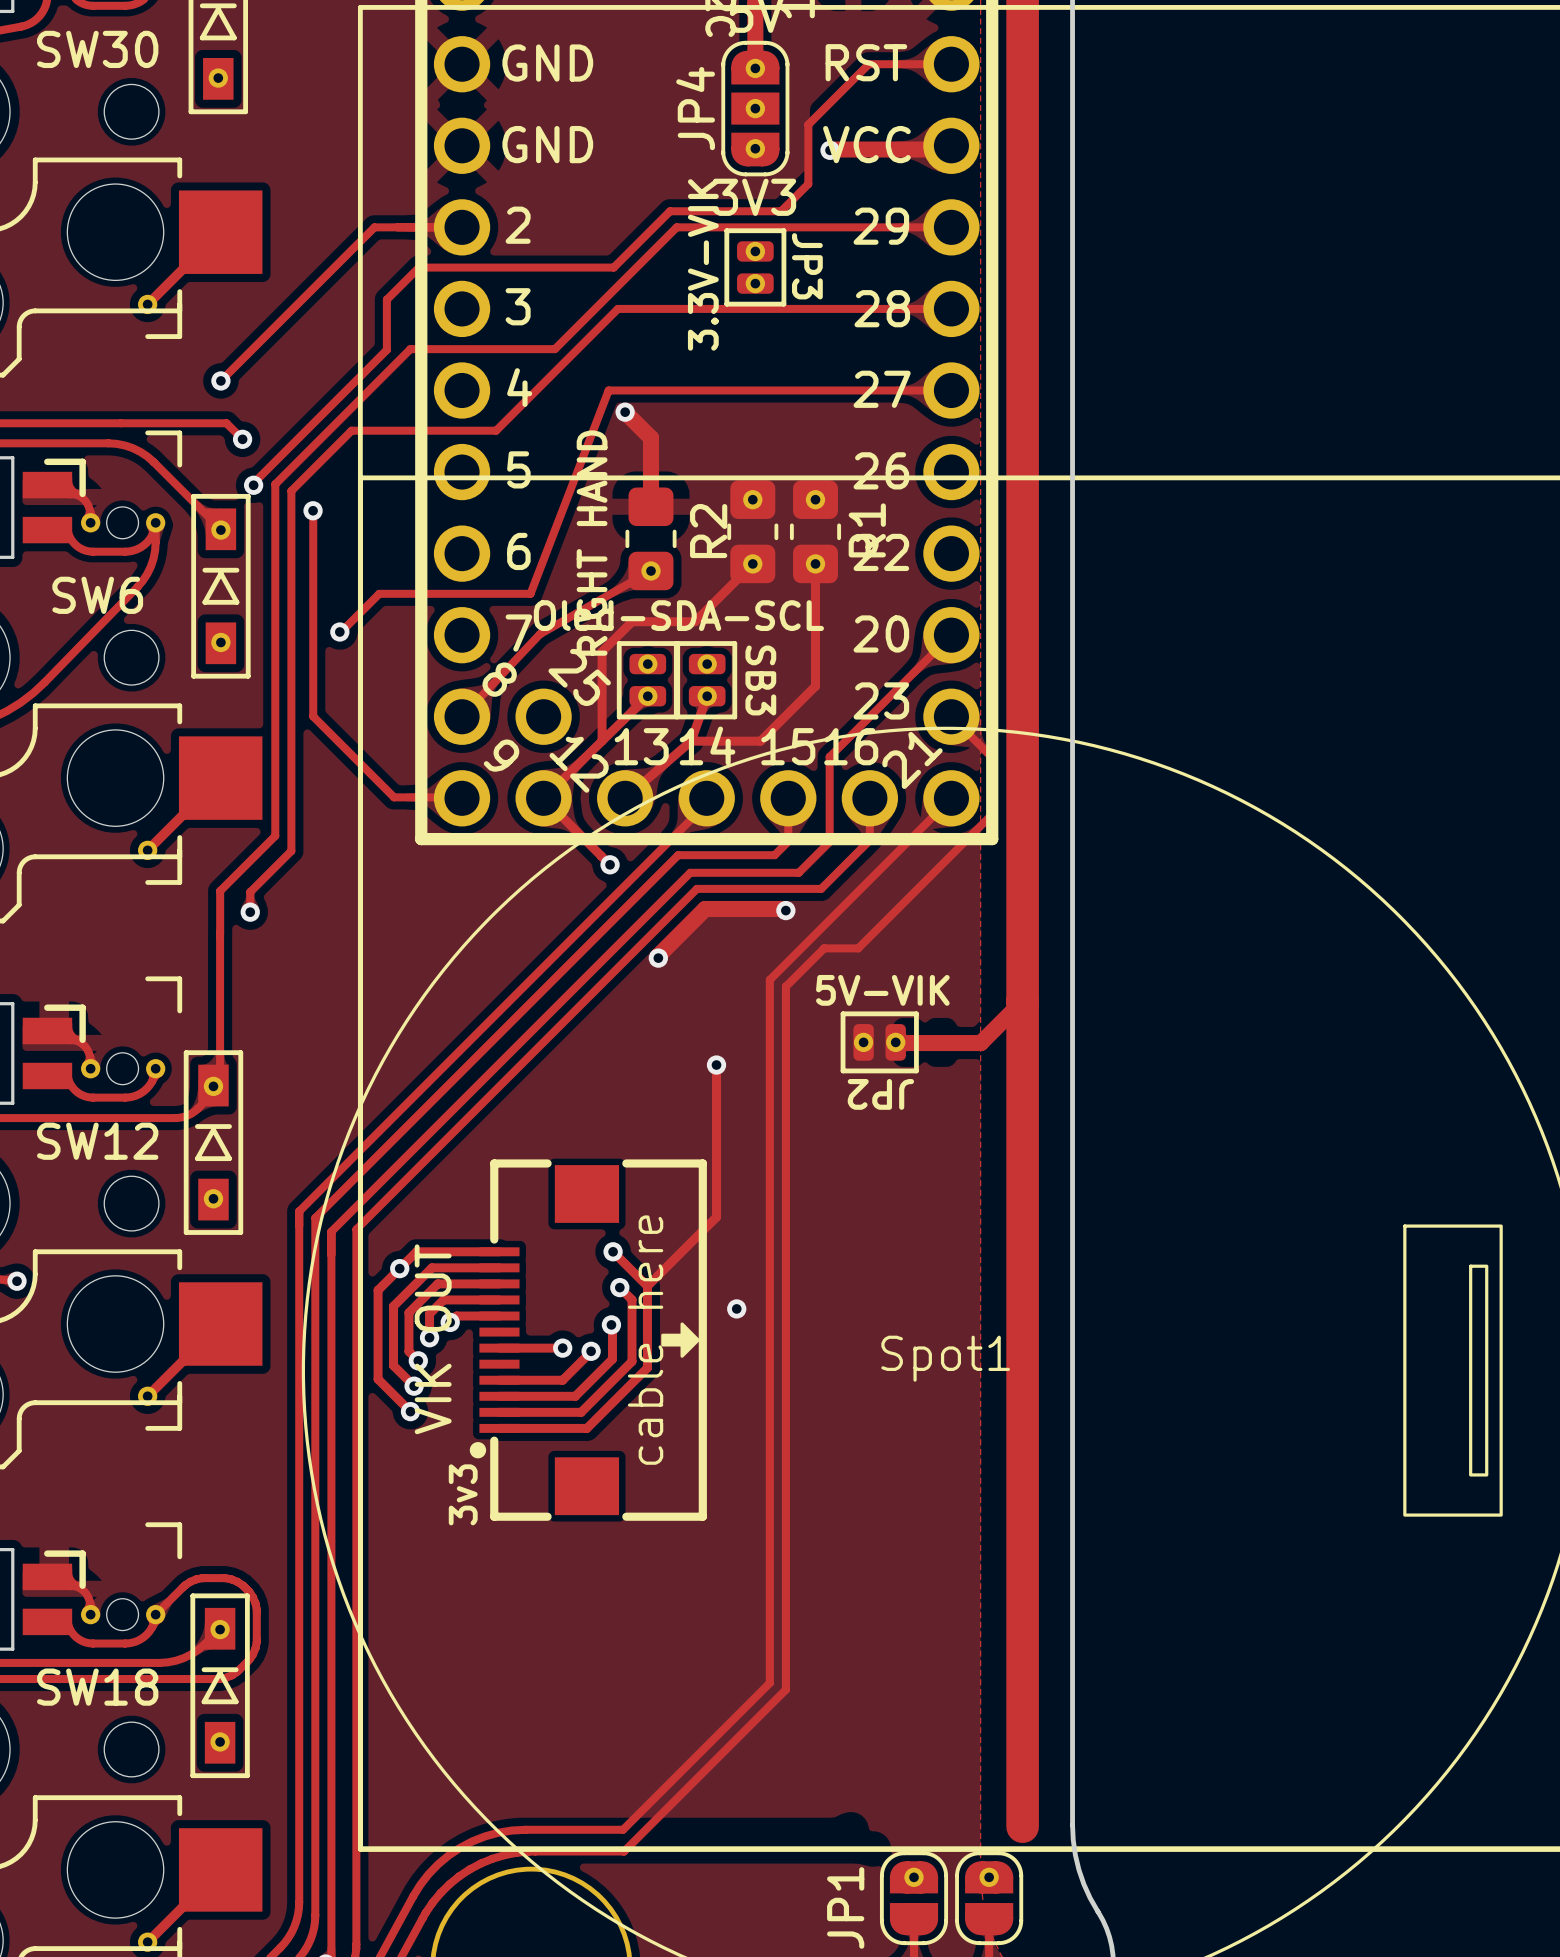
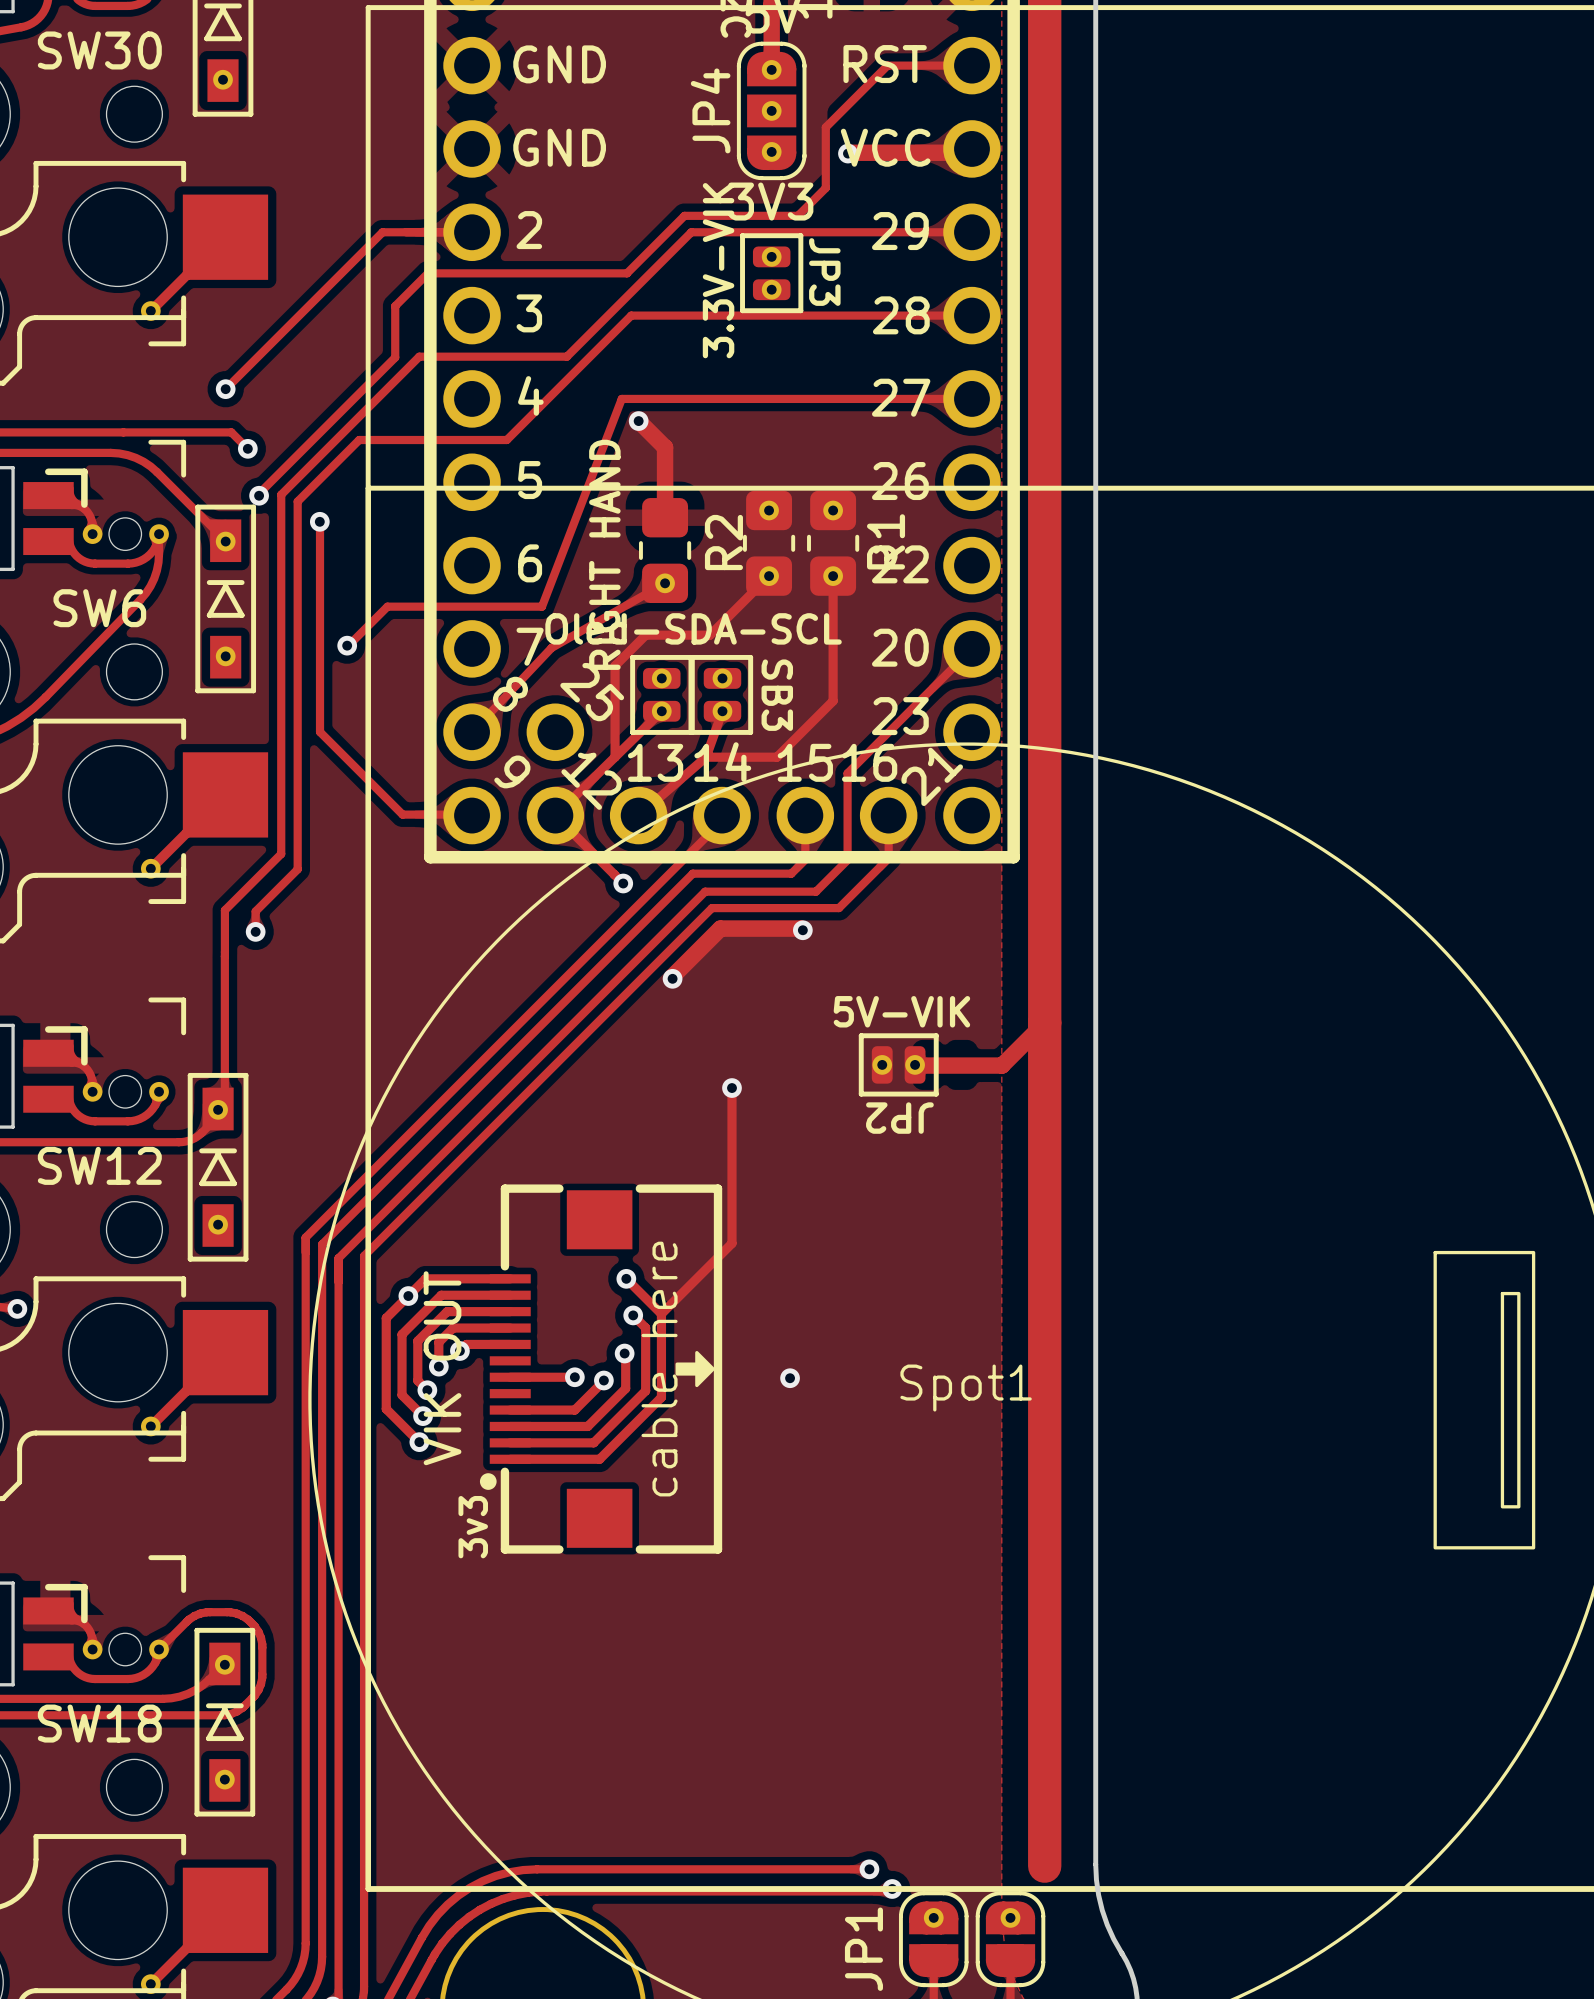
track: (951, 716) (991, 756) (991, 814) (858, 948) (824, 948) (785, 986) (785, 1689) (624, 1851) -> (892, 1889) (889, 1891) (637, 1891)
track: (951, 798) (769, 979) (769, 1683) (623, 1829) -> (869, 1869) (636, 1869)
via position: (736, 1308) -> (790, 1378)
via: none -> (869, 1869)
via: none -> (892, 1889)

